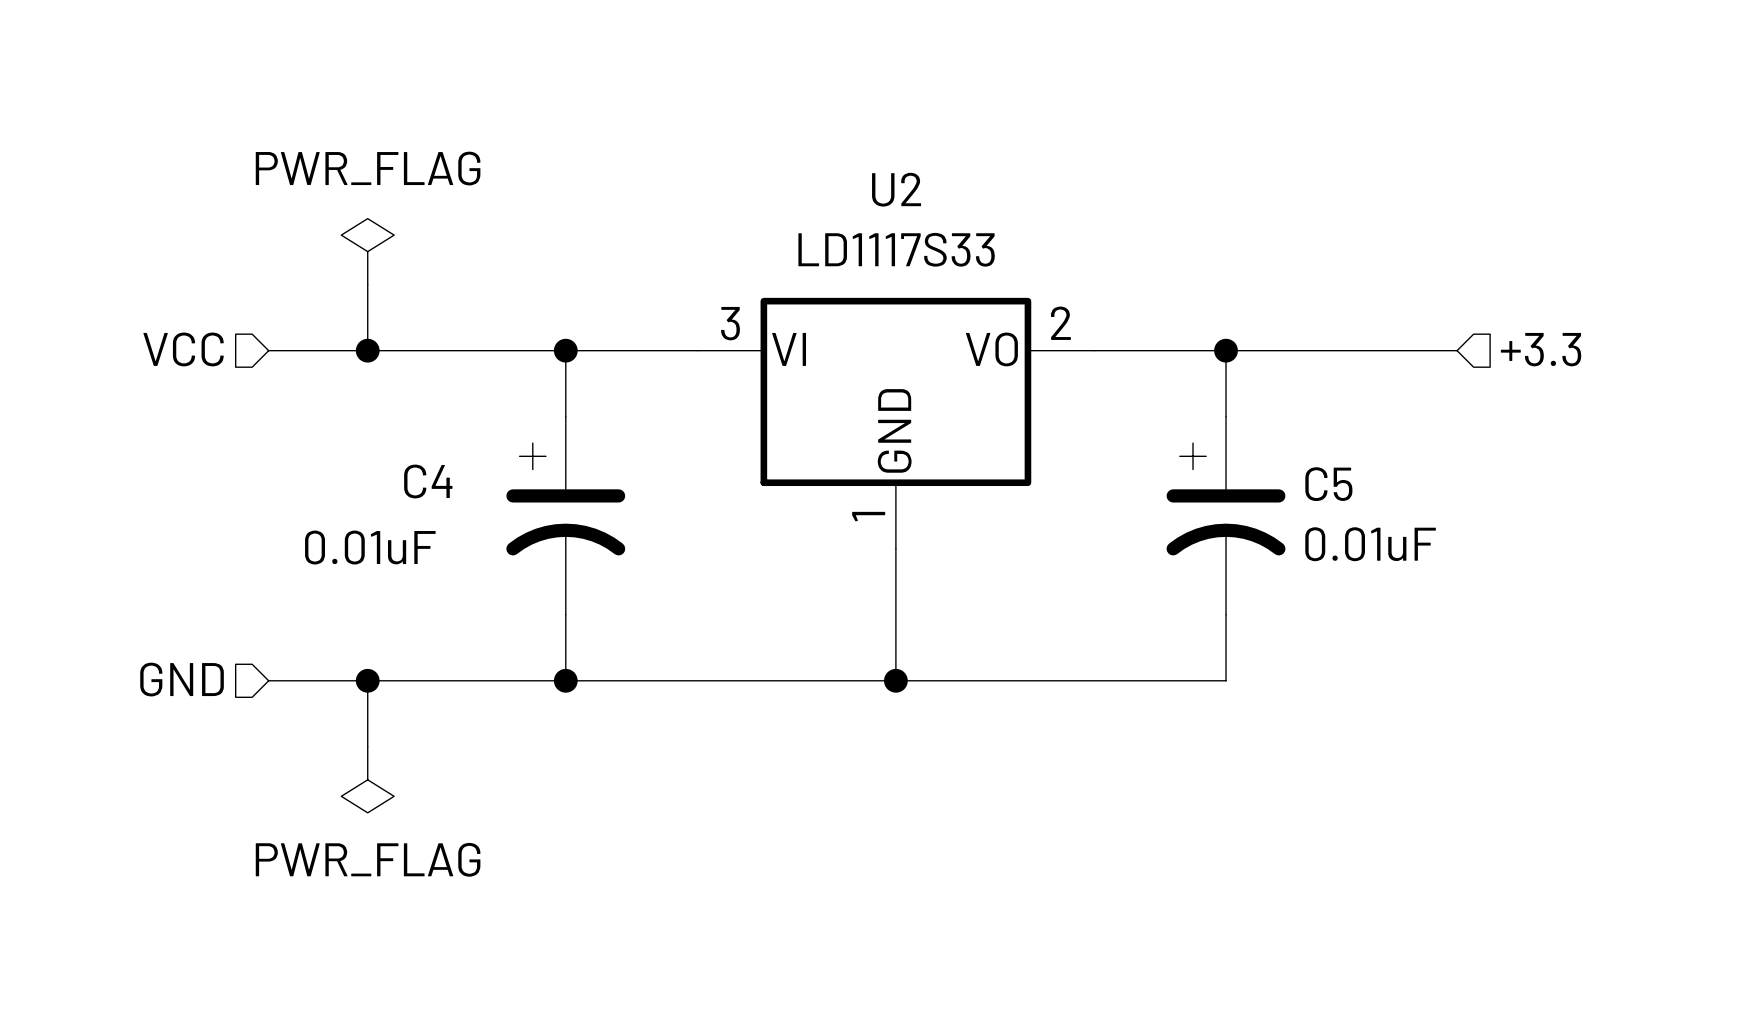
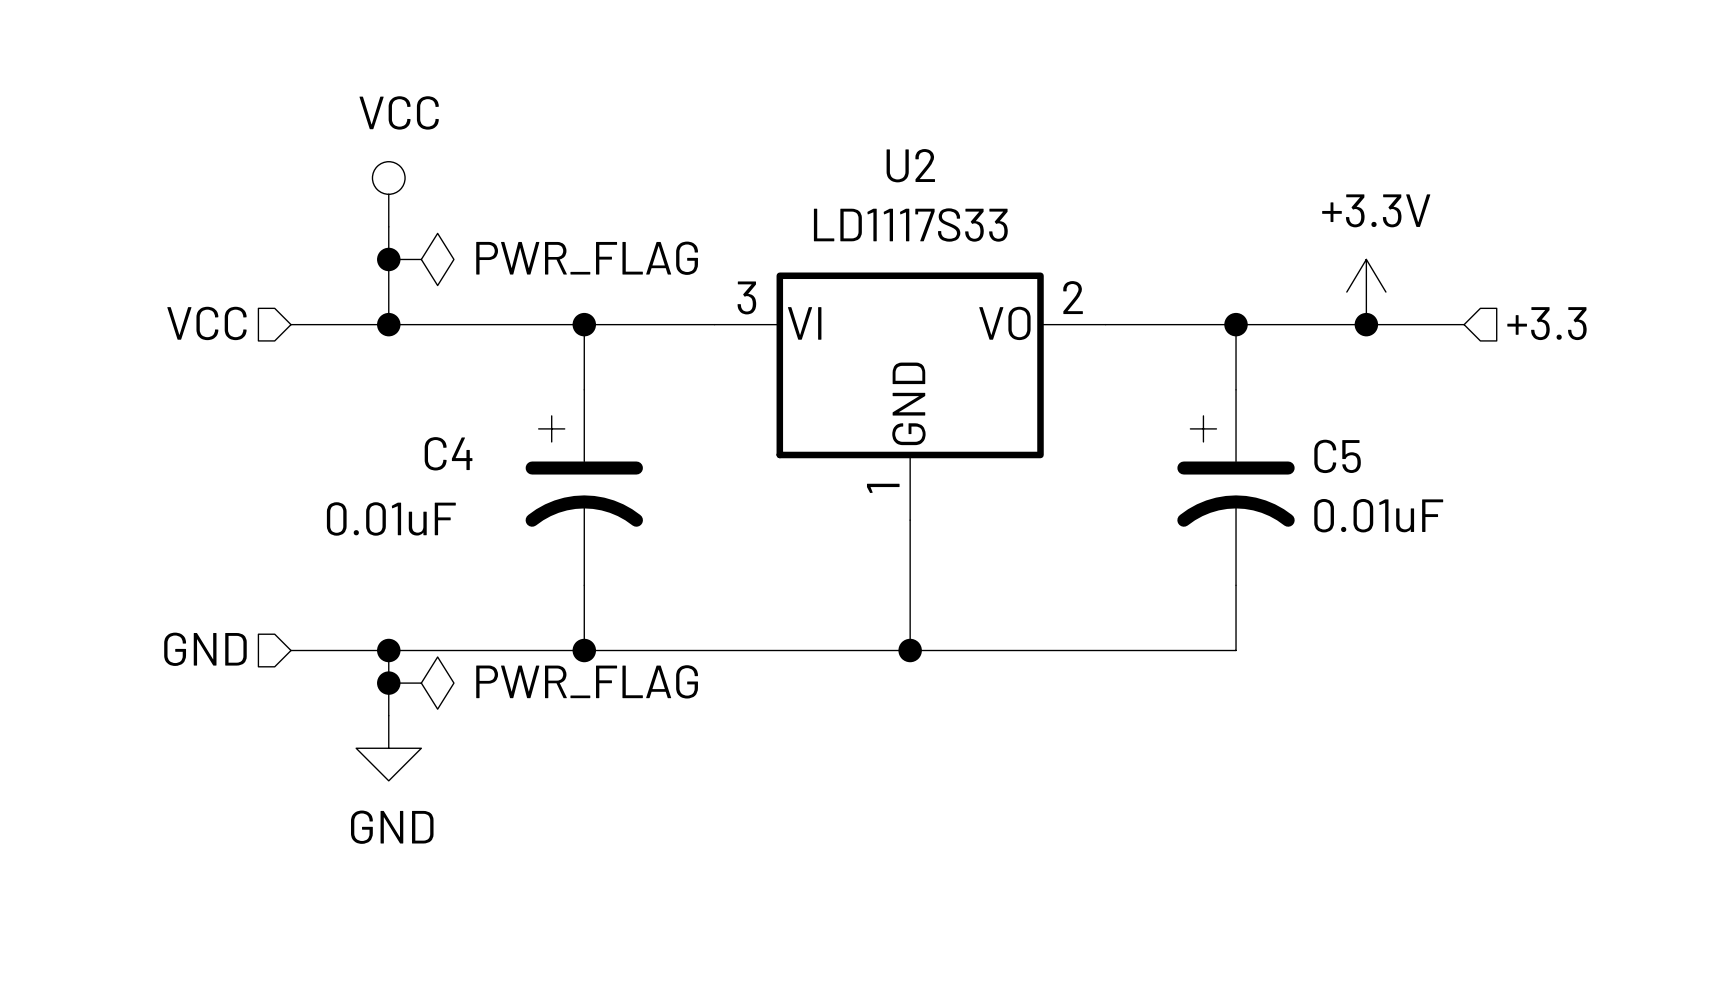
power symbol text position: PWR_FLAG (368, 168) -> PWR_FLAG (587, 258)
power symbol: none -> VCC (388, 194)
power symbol rotation: 0° (367, 251) -> 90° clockwise (421, 259)
power symbol position: PWR_FLAG (367, 251) -> PWR_FLAG (421, 259)
junction: none -> (388, 259)
power symbol: none -> +3.3V (1366, 292)
junction: none -> (1366, 324)
junction: none -> (388, 683)
power symbol: none -> PWR_FLAG (421, 683)
power symbol: PWR_FLAG (367, 779) -> GND (388, 748)

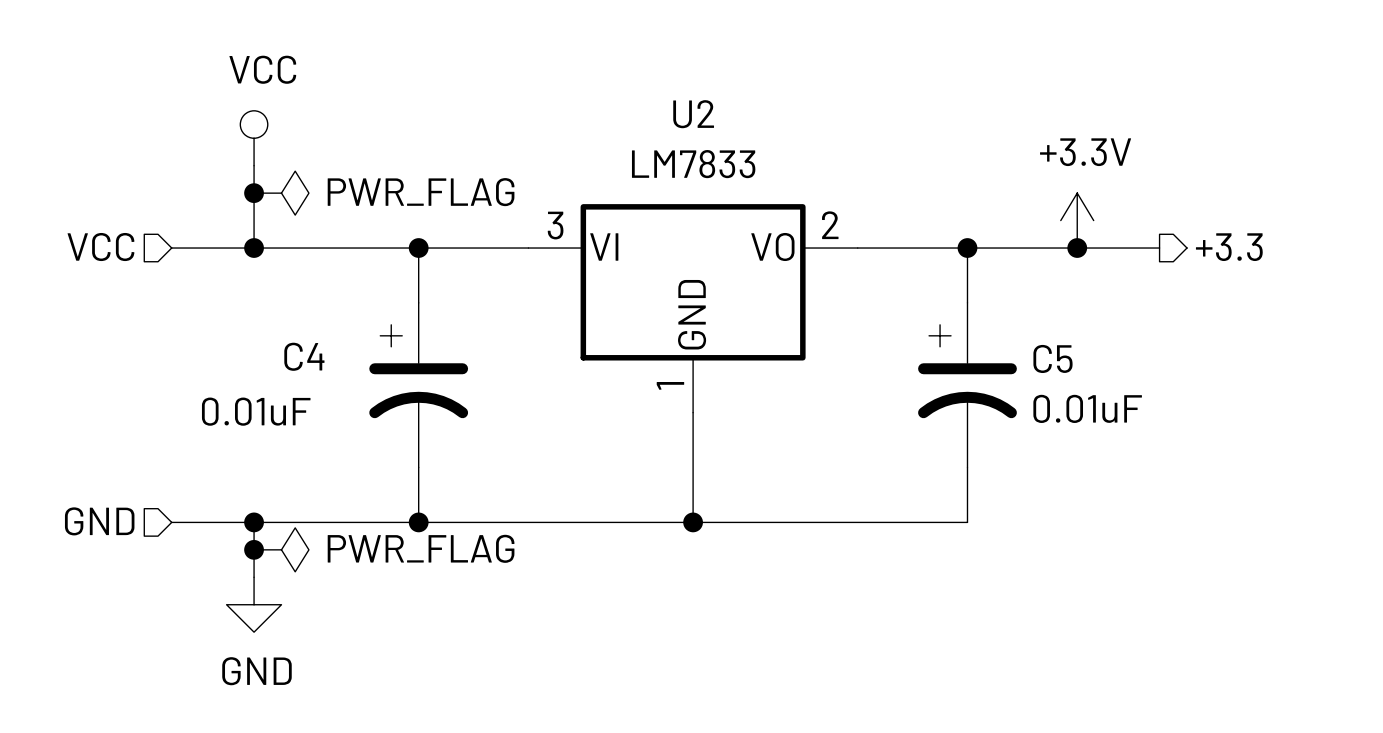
U2 value: LD1117S33 (910, 225) -> LM7833 (693, 164)
hierarchical label shape: input (1546, 323) -> output (1229, 247)

